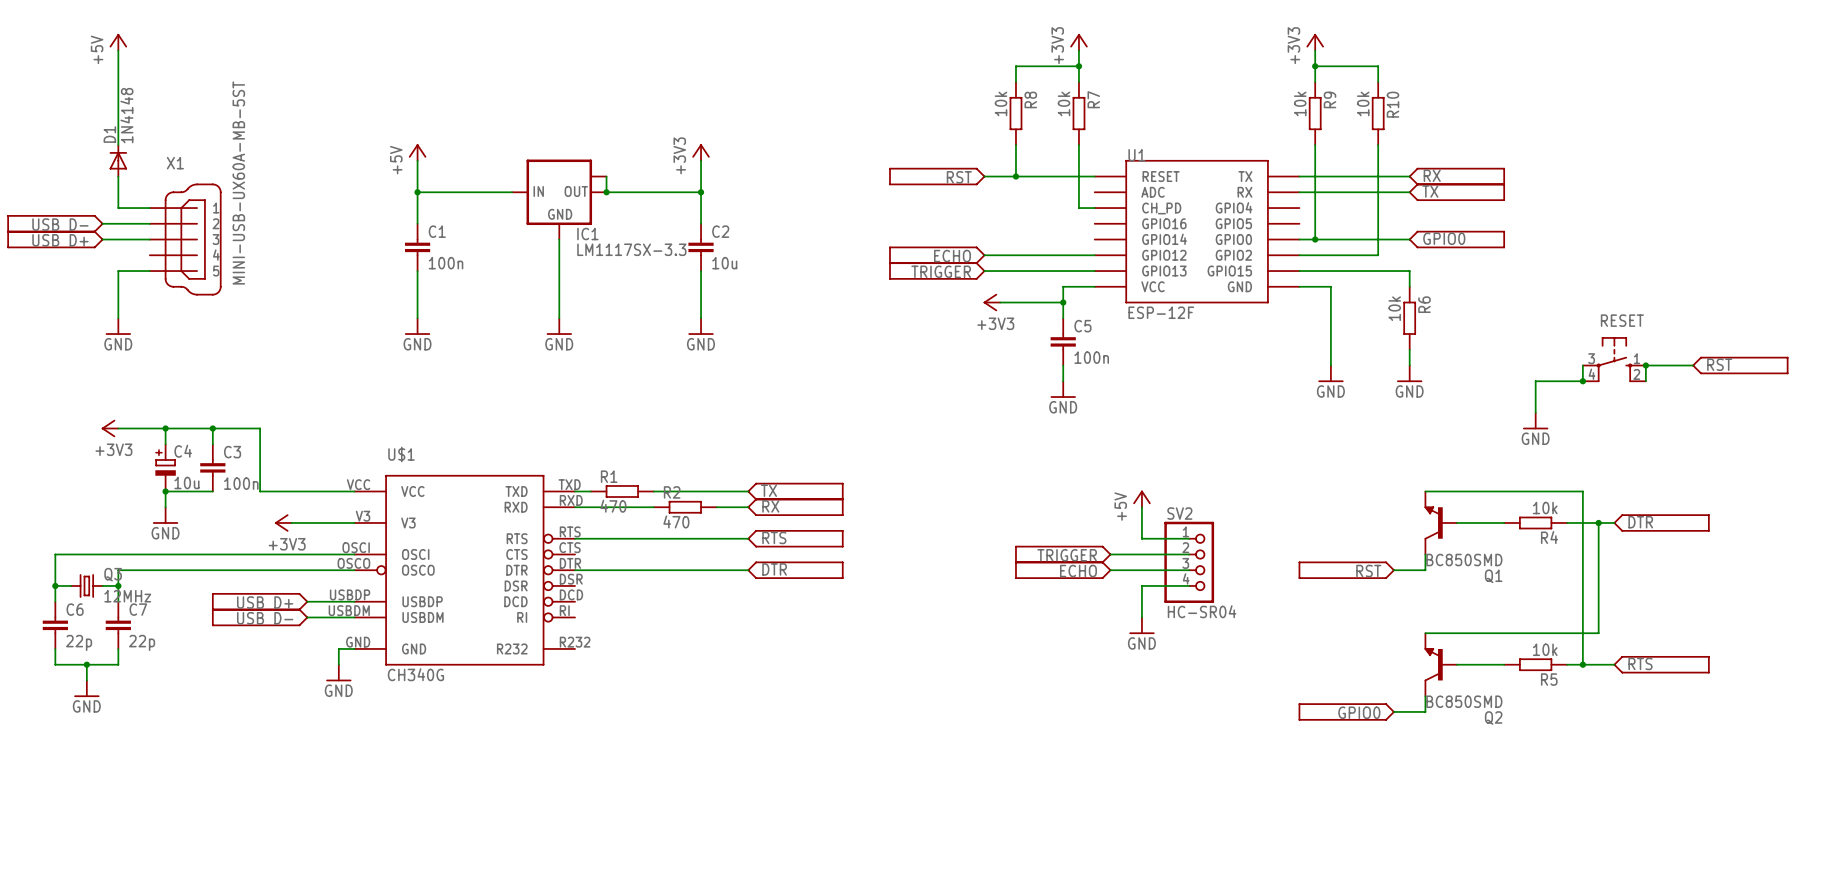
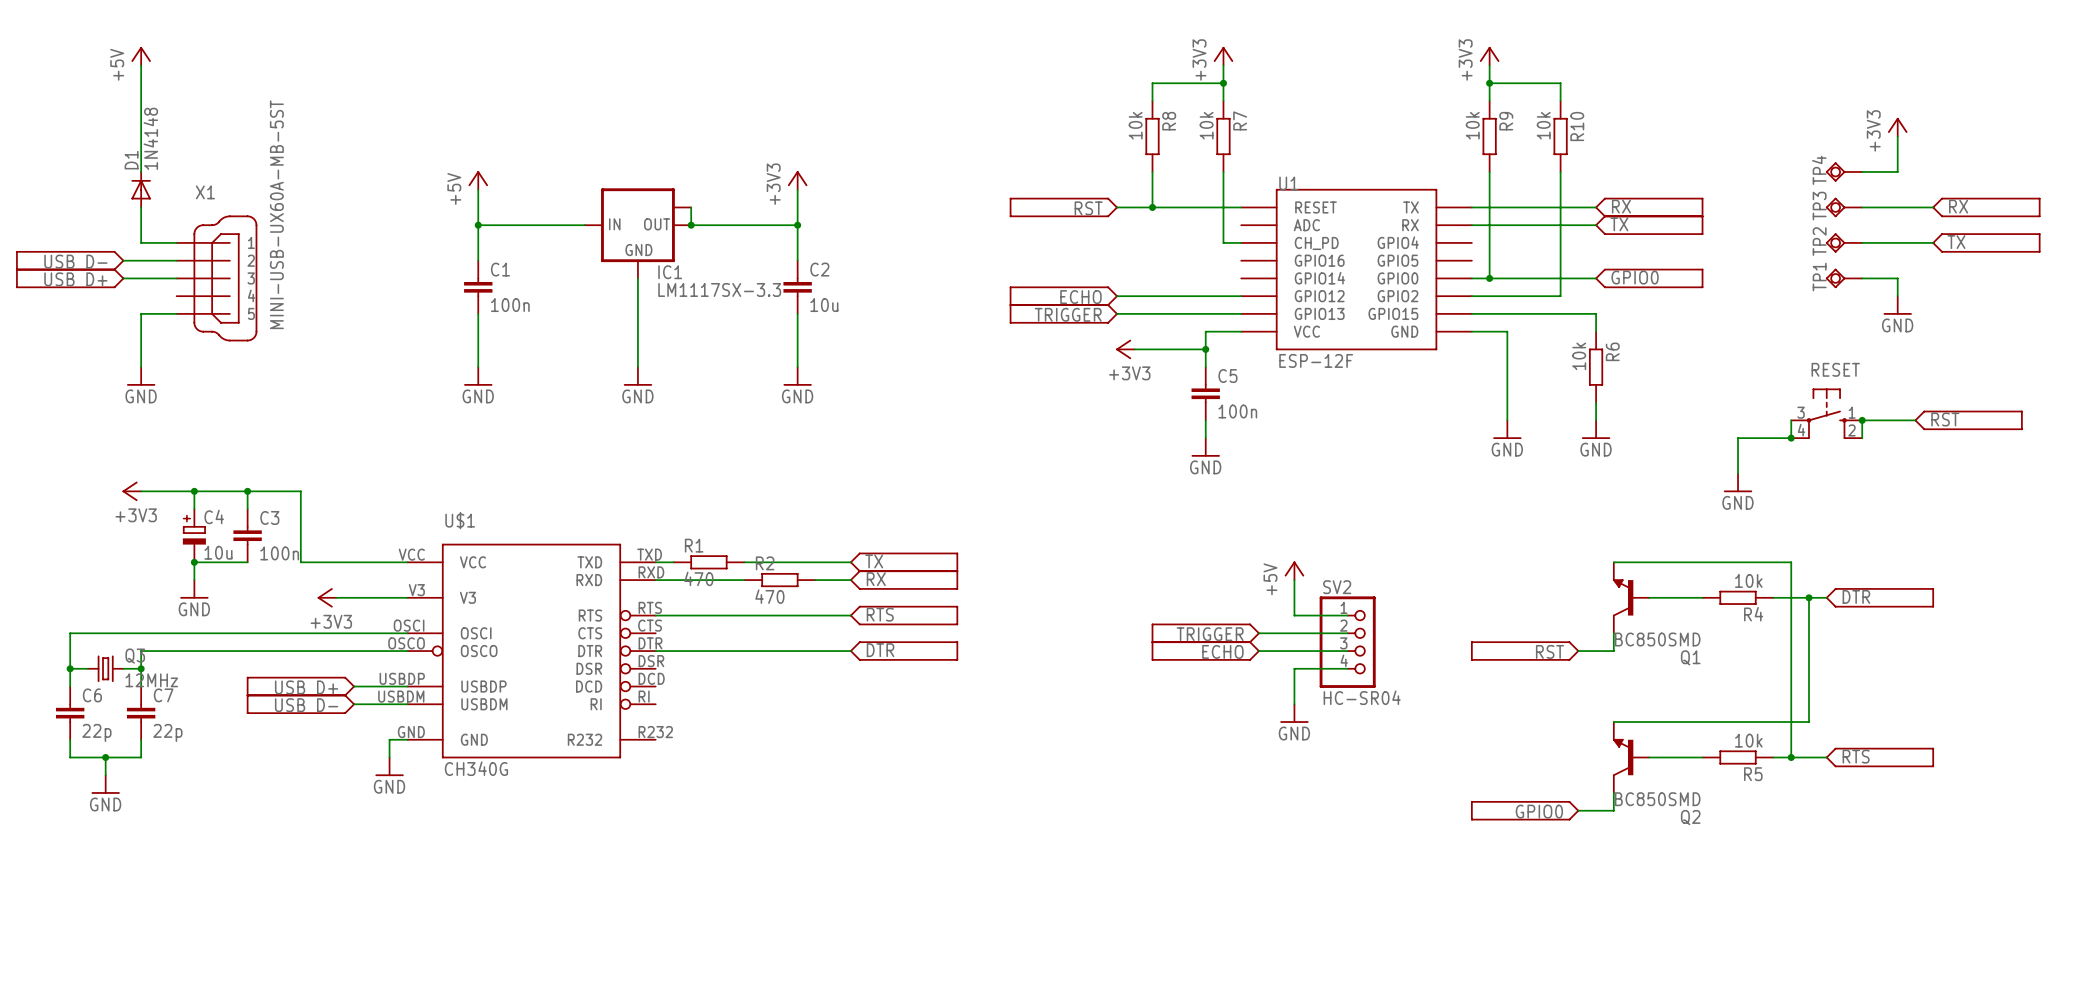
power symbol: none -> +3V3 (1897, 127)
wire: none -> (1897, 136) (1897, 171) (1862, 171)
TP4: none -> (1844, 171)
TP3: none -> (1844, 207)
wire: none -> (1862, 207) (1933, 207)
part: none -> RX (1986, 207)
TP2: none -> (1844, 242)
wire: none -> (1862, 242) (1933, 242)
part: none -> TX (1986, 242)
TP1: none -> (1844, 278)
wire: none -> (1862, 278) (1897, 278) (1897, 296)
power symbol: none -> GND (1897, 305)

